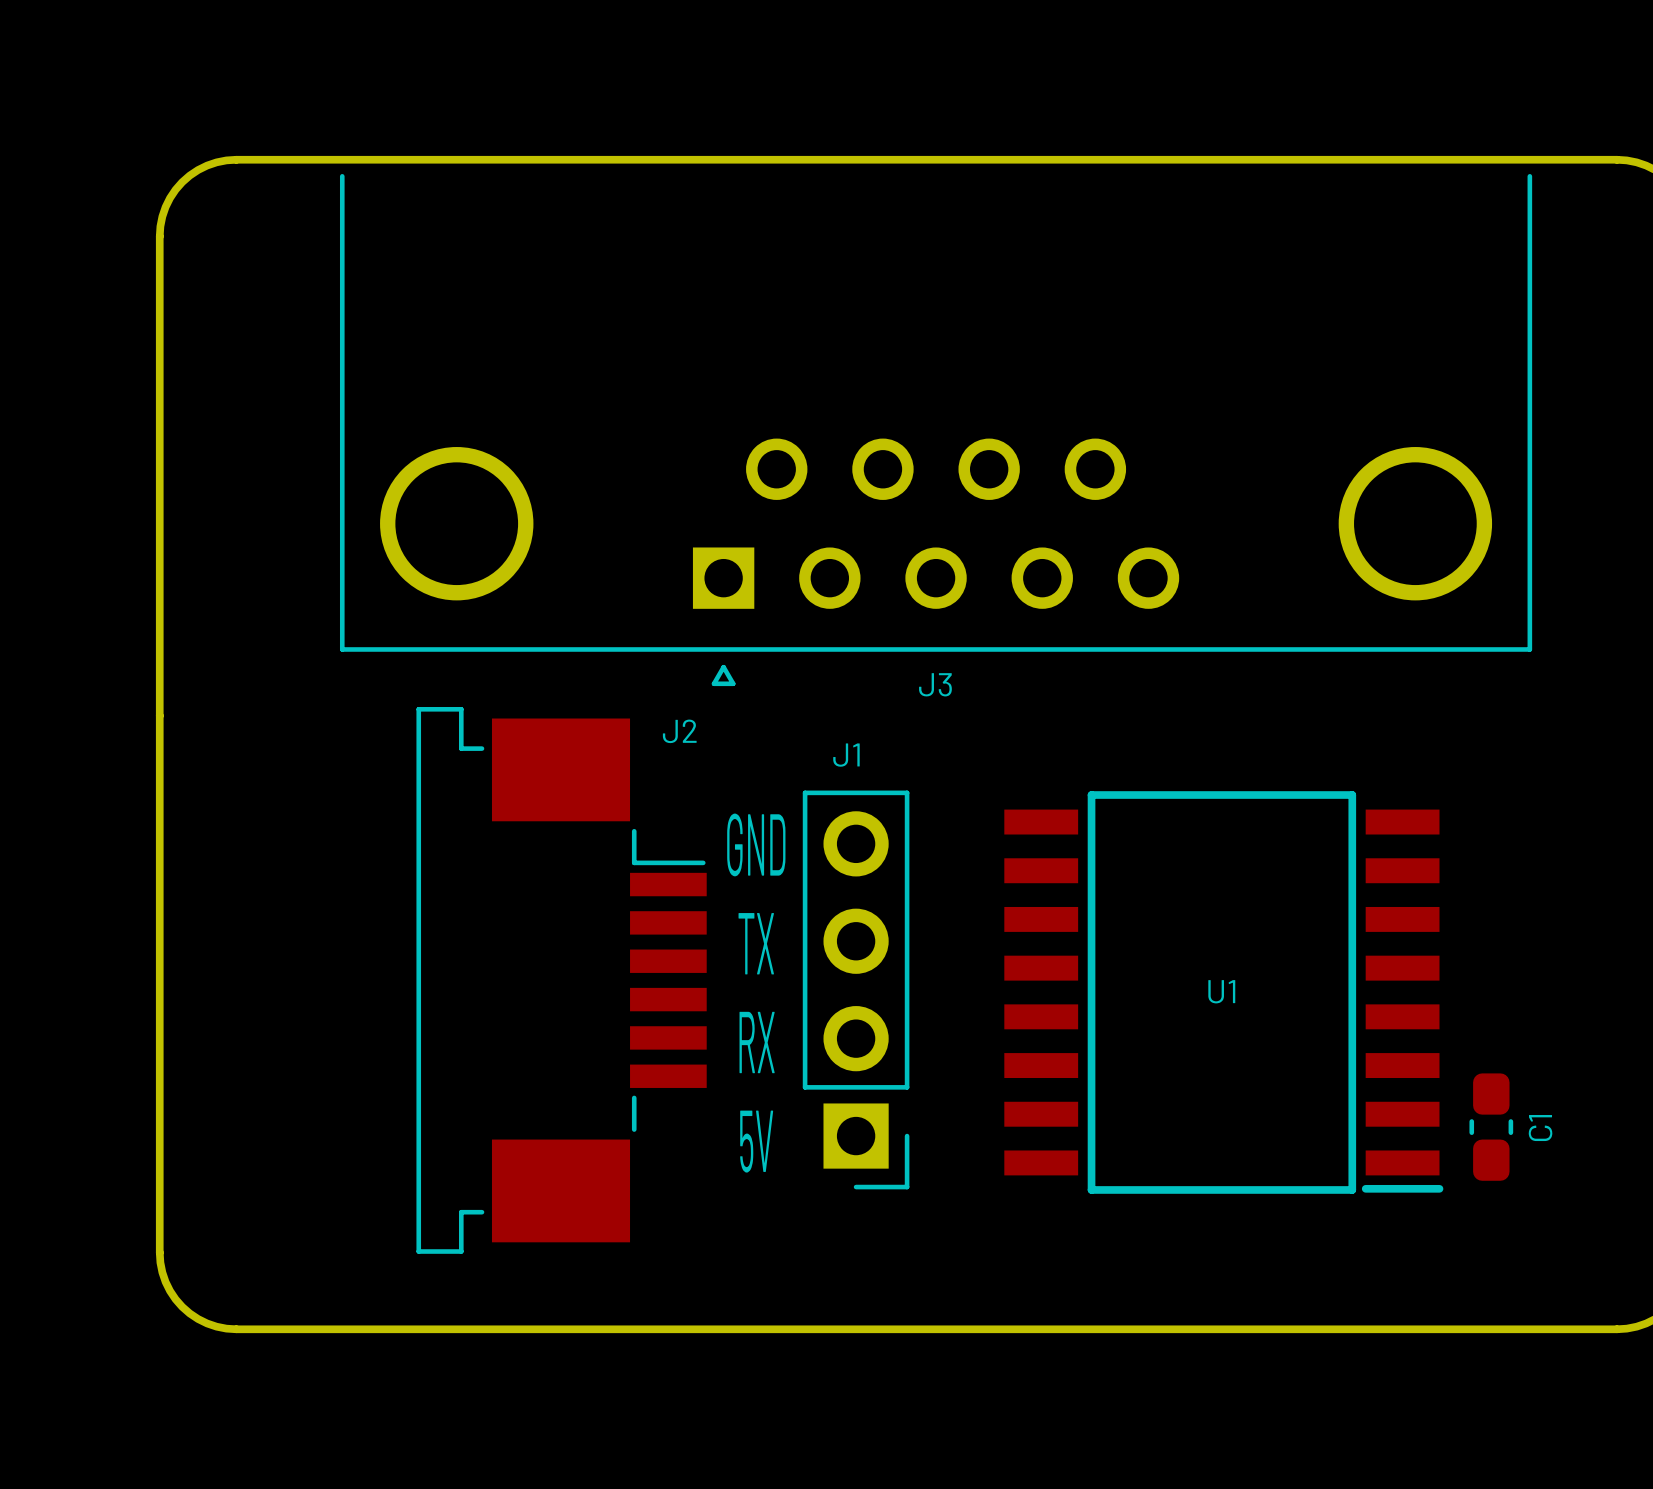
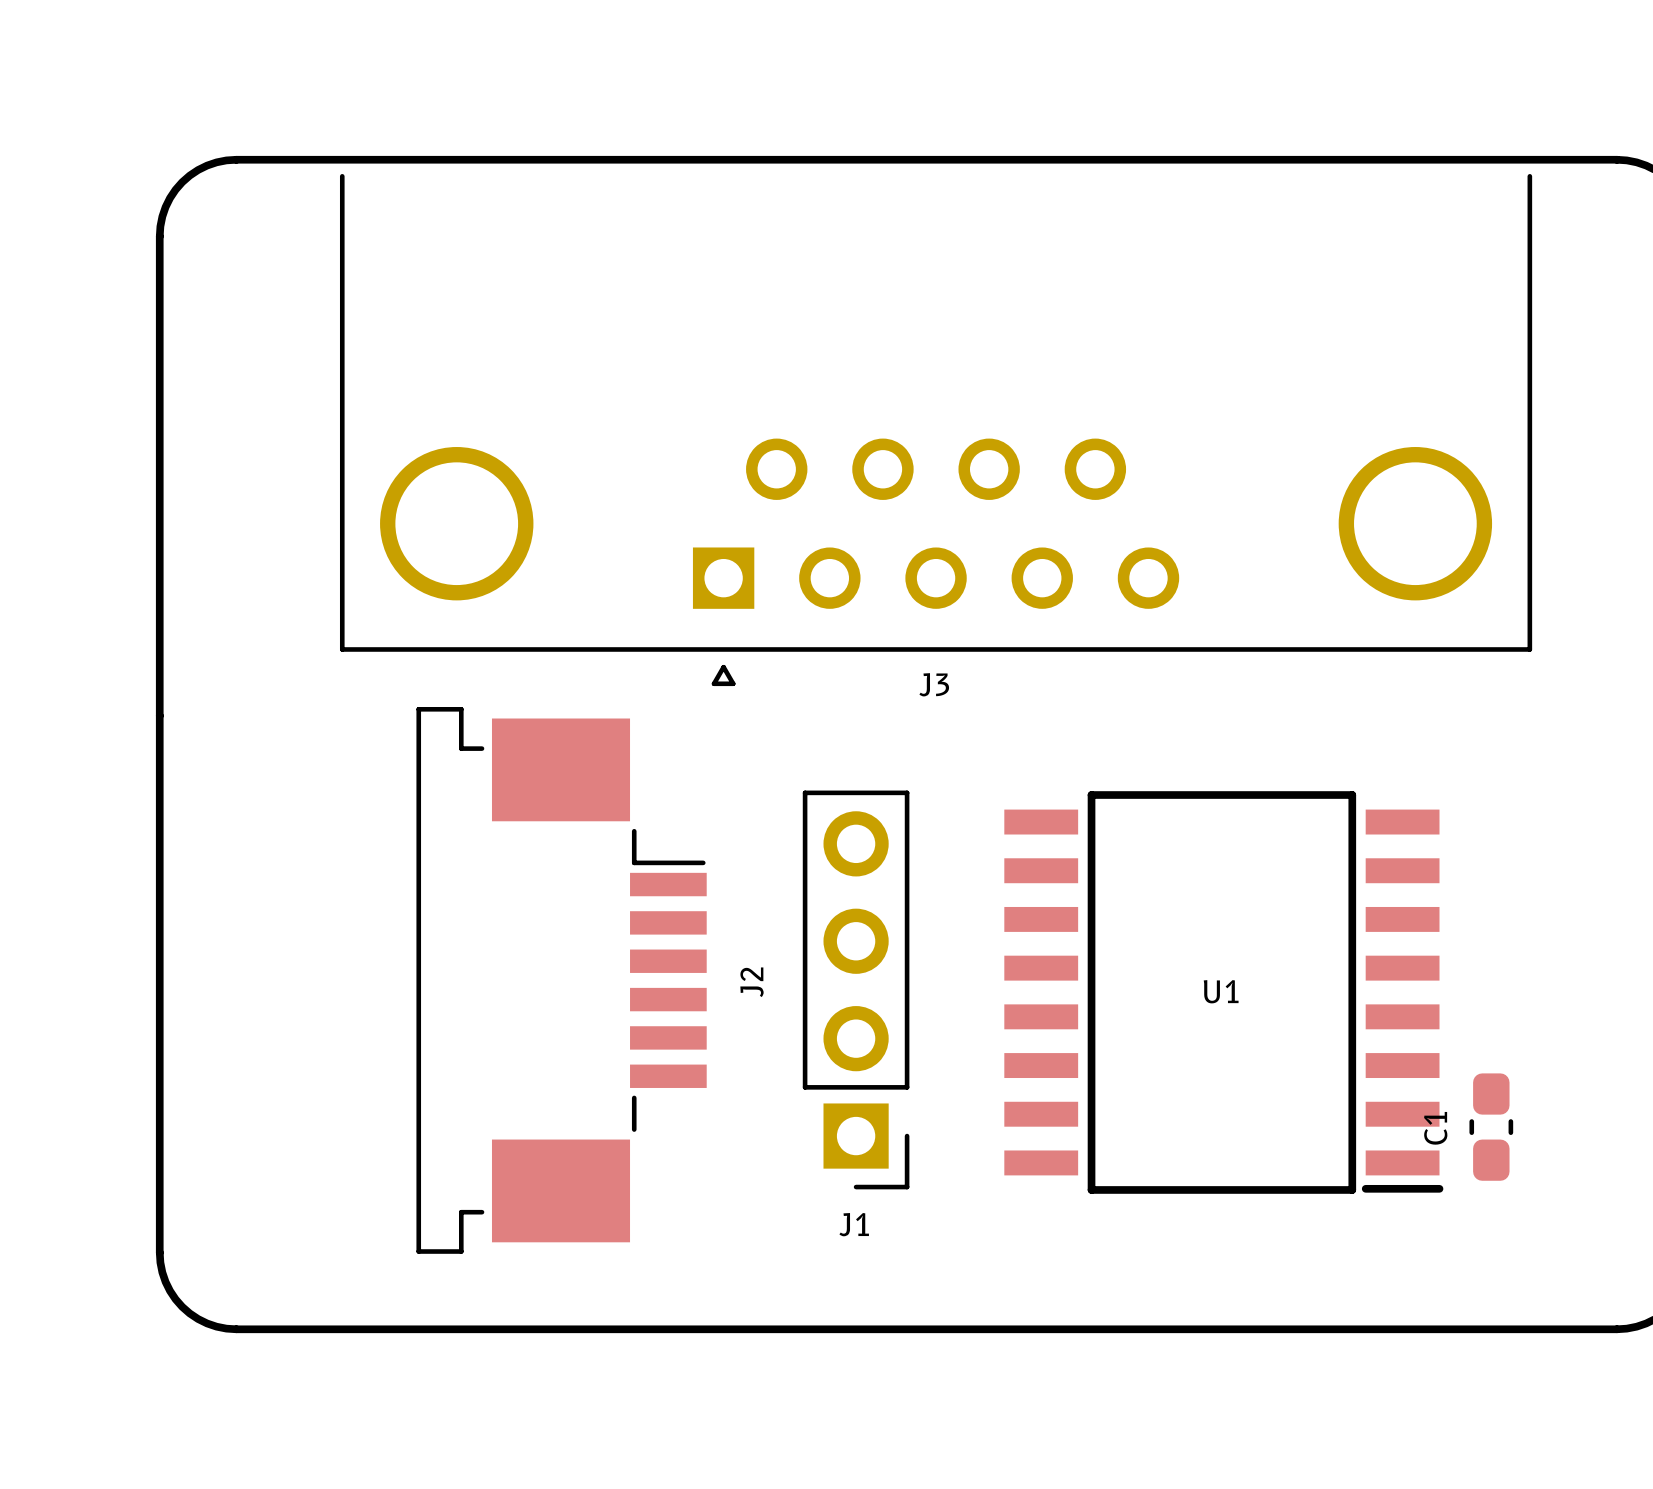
J2 name rotation: 0° (679, 731) -> 90° counterclockwise (751, 982)
J2 name position: J2 (679, 731) -> J2 (751, 982)
J1 name position: J1 (846, 755) -> J1 (854, 1224)
text: GND (756, 844) -> none
text: TX (756, 943) -> none
text: RX (757, 1042) -> none
C1 name position: C1 (1540, 1128) -> C1 (1435, 1128)
text: 5V (756, 1141) -> none

